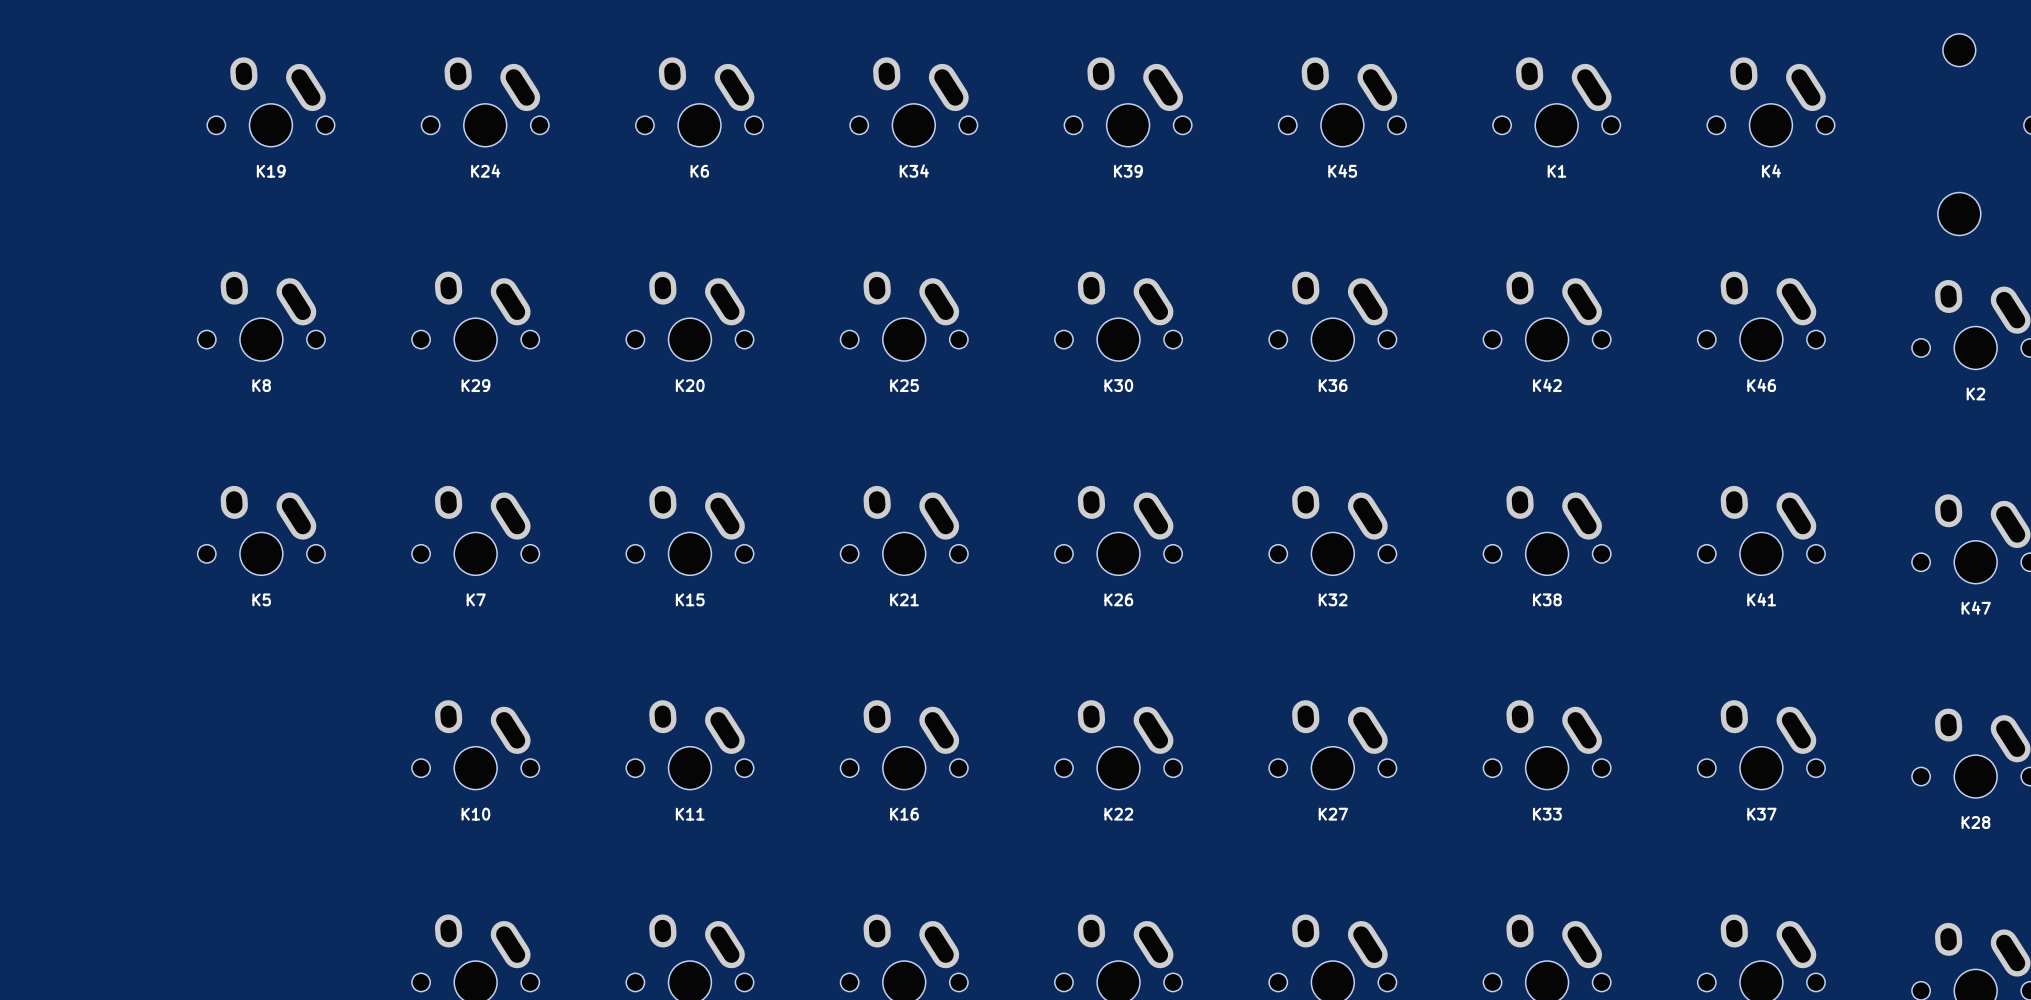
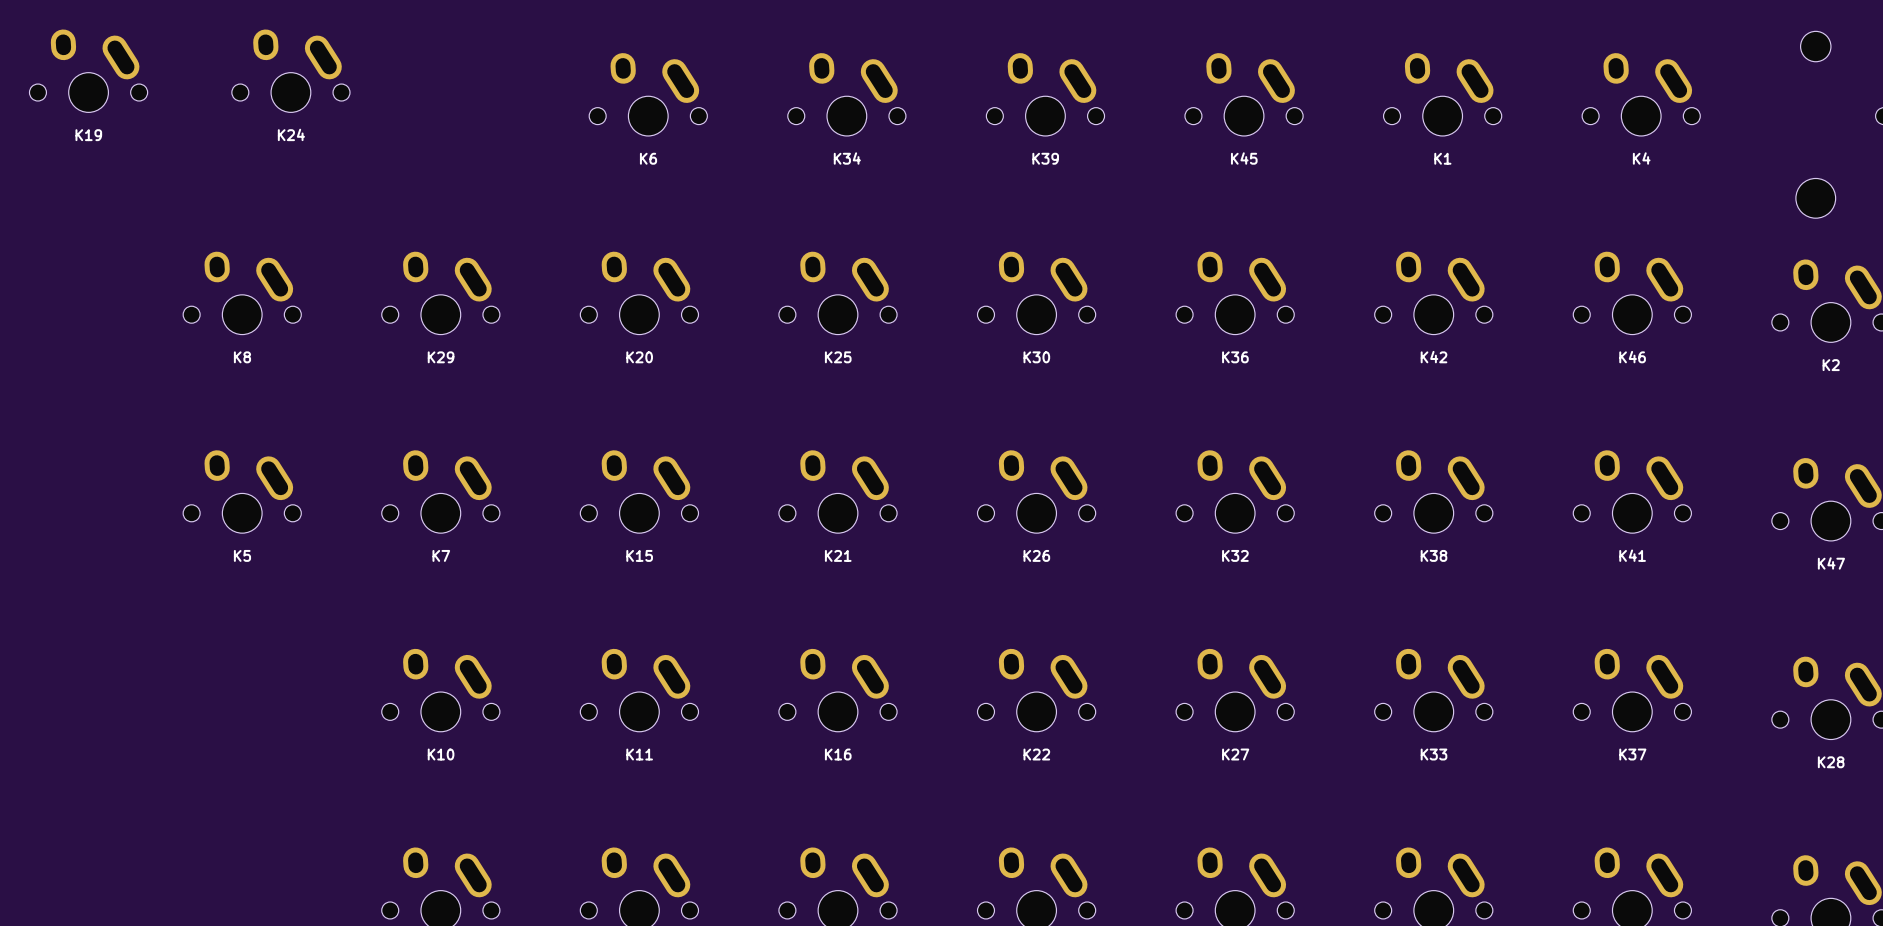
K19 position: (270, 102) -> (88, 70)
K24 position: (485, 102) -> (290, 70)

